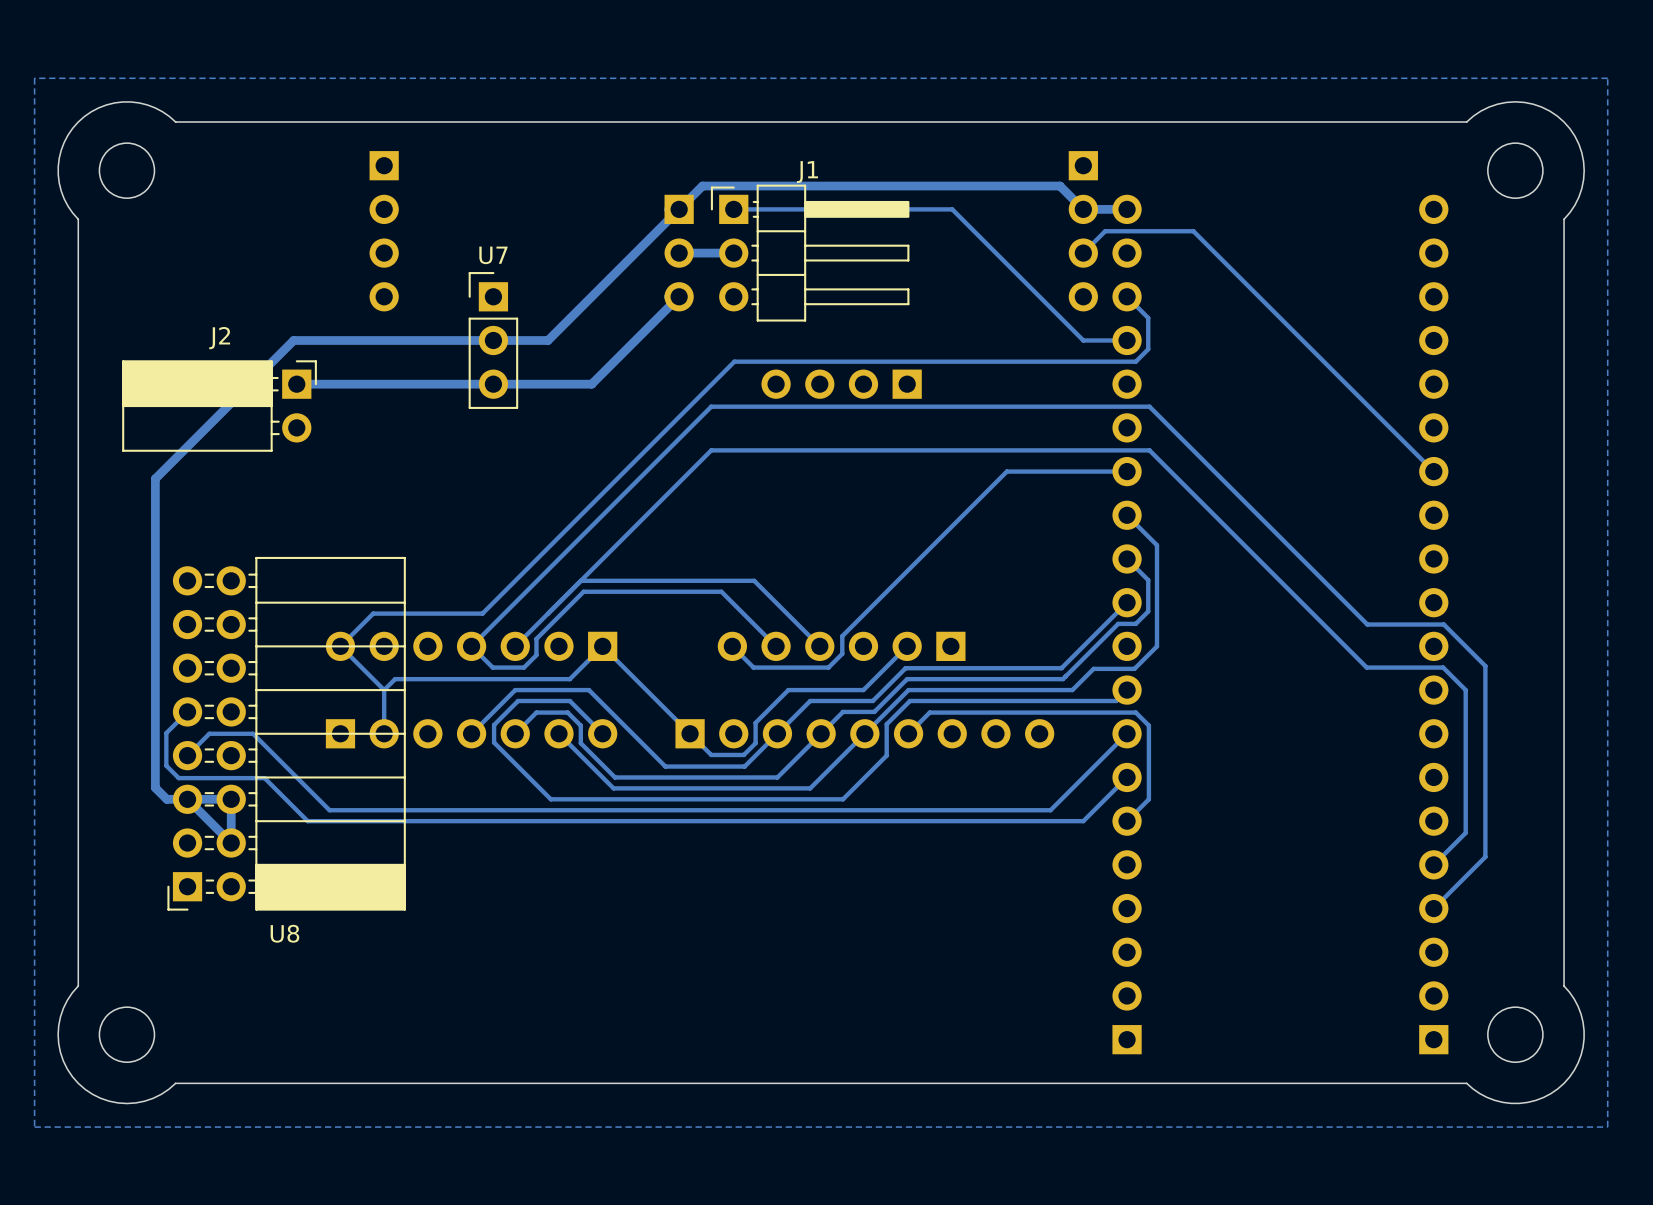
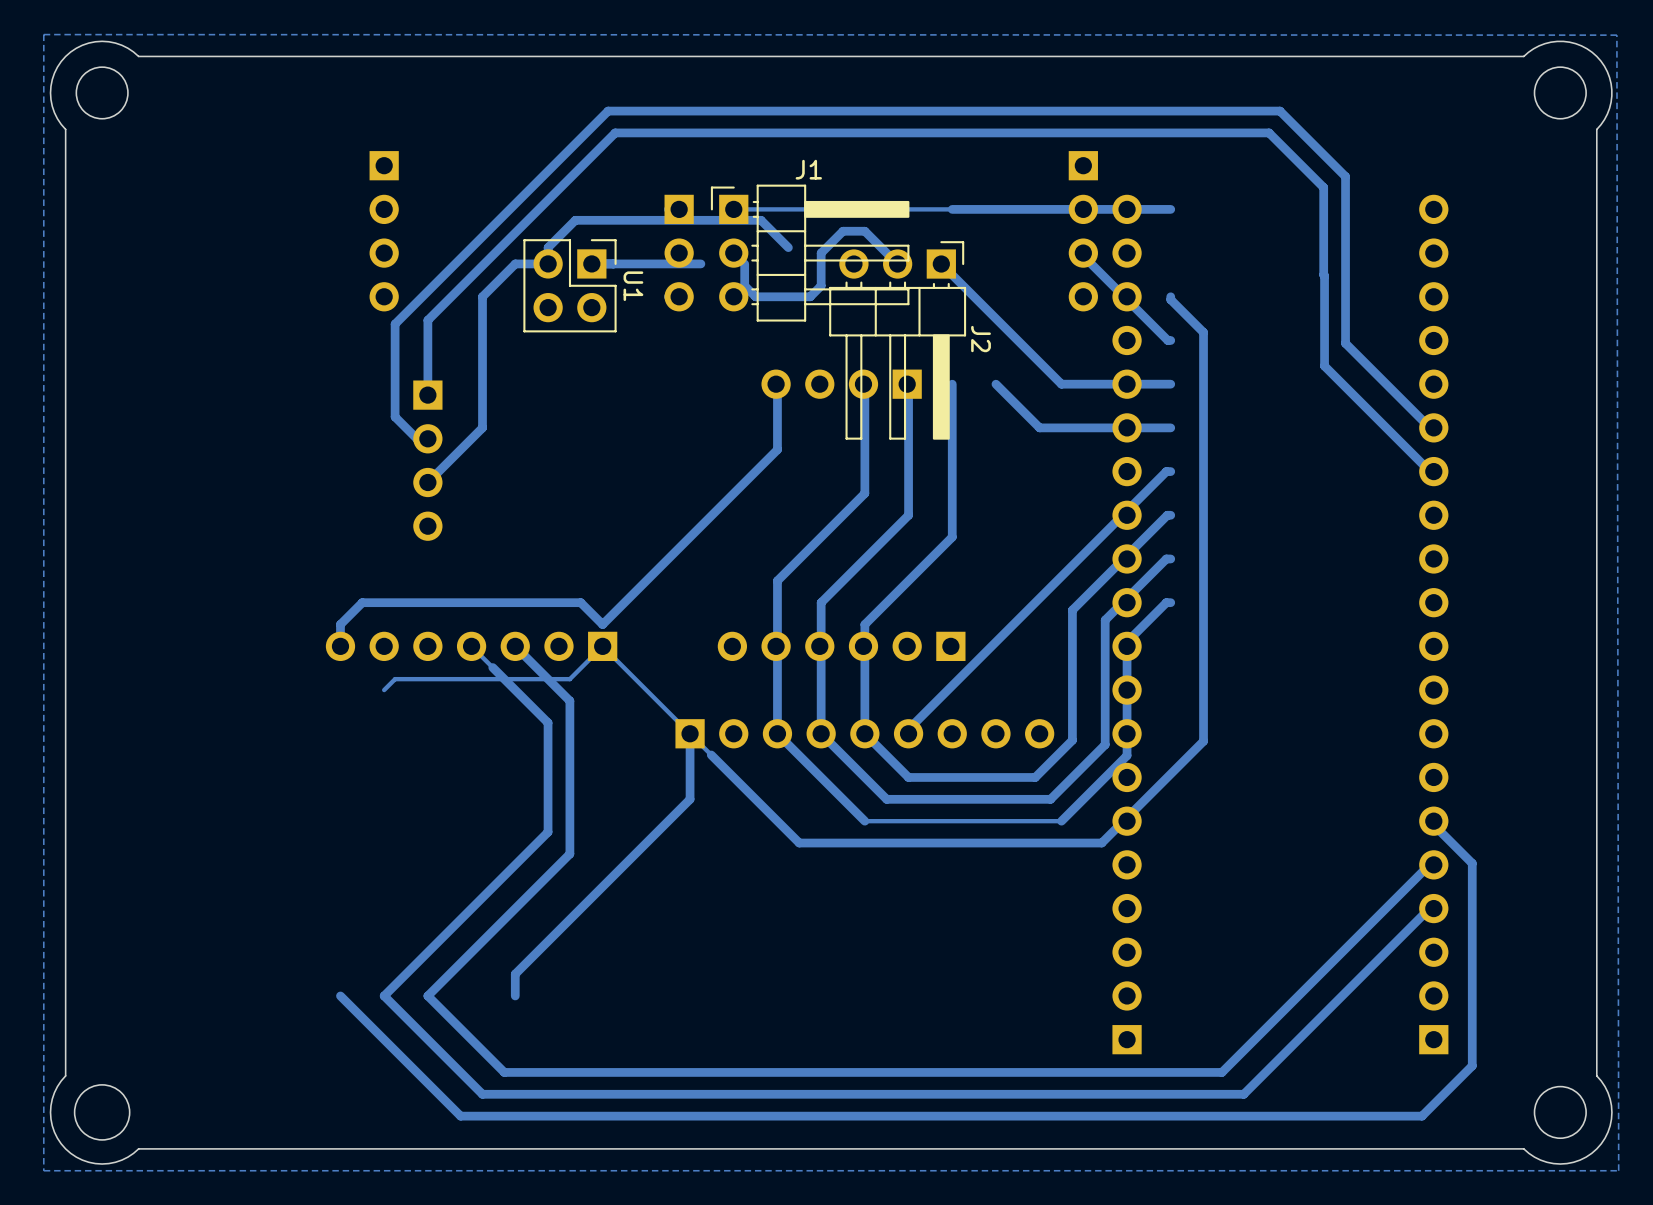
round board edge: none -> [75, 66, 129, 120]
round board edge: none -> [1534, 66, 1587, 120]
bottom zone outline: (1607, 78) (1607, 1127) (34, 1127) (34, 78) (1607, 78) -> (43, 34) (1616, 35) (1618, 1170) (43, 1170) (43, 34)
board edge: (1466, 121) (175, 121) (155, 107) (131, 101) (114, 102) (91, 111) (78, 121) (68, 135) (61, 150) (58, 166) (59, 183) (64, 198) (78, 219) (78, 986) (63, 1008) (58, 1034) (60, 1052) (72, 1076) (85, 1089) (100, 1098) (126, 1103) (153, 1098) (175, 1083) (1466, 1083) (1487, 1097) (1511, 1103) (1535, 1100) (1550, 1093) (1564, 1083) (1574, 1070) (1581, 1055) (1584, 1038) (1583, 1022) (1578, 1006) (1564, 986) (1564, 219) (1574, 205) (1581, 188) (1583, 161) (1578, 144) (1569, 128) (1557, 116) (1533, 104) (1515, 101) (1497, 104) (1480, 111) (1466, 121) -> (1523, 56) (1544, 43) (1563, 41) (1575, 43) (1592, 52) (1600, 61) (1609, 77) (1611, 89) (1609, 108) (1596, 129) (1596, 1075) (1608, 1092) (1611, 1112) (1610, 1125) (1605, 1138) (1591, 1153) (1573, 1162) (1560, 1164) (1540, 1160) (1523, 1148) (138, 1148) (121, 1160) (102, 1164) (82, 1160) (70, 1153) (61, 1143) (52, 1125) (50, 1112) (54, 1092) (65, 1075) (65, 129) (54, 112) (50, 92) (54, 73) (61, 61) (70, 52) (82, 45) (102, 41) (121, 45) (138, 56) (1523, 56)
round board edge: [98, 142, 155, 199] -> none
round board edge: [1487, 142, 1544, 199] -> none
bottom track: (952, 209) (1083, 340) (1127, 340) -> (952, 209) (1083, 209)
bottom track: (1083, 209) (1059, 186) (702, 186) (548, 340) (293, 340) (155, 478) (155, 787) (166, 799) (231, 799) (231, 843) (187, 799) -> none
bottom track: none -> (1170, 209) (1127, 209)
bottom track: none -> (788, 247) (761, 220) (575, 220) (548, 247) (548, 263) (515, 263) (482, 296) (482, 427) (427, 482)
bottom track: (733, 253) (678, 253) -> none
bottom track: (1083, 253) (1105, 231) (1193, 231) (1433, 471) -> (1083, 253) (1083, 255) (1167, 340) (1170, 340)
bottom track: none -> (700, 263) (591, 263)
bottom track: none -> (897, 264) (864, 231) (843, 231) (821, 253) (821, 285) (810, 296) (755, 296) (744, 285) (744, 264)
bottom track: none -> (941, 264) (1061, 384) (1170, 384)
U1: none -> (569, 285)
bottom track: (679, 296) (591, 384) (296, 384) -> none
bottom track: (1127, 296) (1148, 317) (1148, 349) (1135, 361) (734, 361) (482, 613) (373, 613) (340, 646) (384, 690) (384, 733) -> none
J2 name position: J2 (219, 338) -> J2 (981, 339)
U7: (493, 340) -> none
J2 footprint: [122, 360, 317, 452] -> [829, 241, 967, 440]
bottom track: none -> (777, 384) (777, 449) (602, 624) (580, 602) (362, 602) (340, 624) (340, 646)
bottom track: none -> (908, 384) (908, 515) (821, 602) (821, 733) (886, 799) (1050, 799) (1105, 744) (1105, 620) (1166, 558) (1170, 558)
bottom track: none -> (952, 384) (952, 537) (864, 624) (864, 733) (908, 777) (1035, 777) (1072, 740) (1072, 610) (1167, 515) (1170, 515)
bottom track: none -> (995, 384) (1039, 427) (1170, 427)
bottom track: none -> (427, 395) (427, 320) (615, 132) (1269, 132) (1323, 187) (1324, 366) (1430, 471)
bottom track: none -> (1430, 427) (1345, 343) (1345, 176) (1279, 111) (608, 111) (395, 324) (395, 416) (416, 438) (427, 438)
part: none -> (427, 460)
bottom track: (1127, 471) (1006, 471) (842, 636) (842, 653) (828, 667) (753, 667) (732, 646) -> none
bottom track: (1127, 515) (1157, 545) (1157, 646) (1134, 668) (1093, 668) (1072, 690) (908, 690) (810, 788) (613, 788) (558, 733) -> none
bottom track: (1127, 558) (1148, 580) (1148, 611) (1135, 623) (1118, 623) (1062, 679) (907, 679) (874, 711) (843, 711) (777, 777) (615, 777) (580, 743) (580, 725) (567, 712) (536, 712) (515, 733) -> none
bottom track: (580, 580) (754, 580) (819, 646) -> none
bottom track: (1127, 602) (1062, 667) -> none
bottom track: (471, 646) (711, 406) (1149, 406) (1367, 624) (1443, 624) (1485, 666) (1485, 856) (1433, 908) -> none
bottom track: (515, 646) (711, 450) (1149, 450) (1366, 667) (1443, 667) (1465, 690) (1465, 832) (1433, 864) -> (515, 646) (569, 701) (569, 853) (427, 995) (504, 1072) (1221, 1072) (1429, 864)
bottom track: (776, 646) (721, 591) (583, 591) (536, 638) (536, 655) (524, 667) (492, 667) -> (1429, 908) (1243, 1094) (482, 1094) (384, 995) (548, 832) (548, 722) (492, 667)
bottom track: (907, 646) (863, 690) (788, 690) (755, 722) (755, 743) (743, 754) (711, 754) -> (1170, 296) (1170, 299) (1203, 332) (1203, 741) (1101, 843) (799, 843) (711, 754)
bottom track: (1062, 667) (905, 668) (872, 701) (810, 701) (744, 766) (665, 766) (588, 690) (515, 690) (471, 733) -> none
bottom track: (1127, 690) (1116, 701) (910, 701) (886, 724) (886, 755) (843, 799) (550, 799) (494, 742) (494, 724) (518, 701) (569, 701) (602, 733) -> none
bottom track: (187, 711) (166, 733) (166, 765) (178, 778) (264, 778) (307, 821) (864, 821) -> (864, 384) (864, 493) (777, 580) (777, 733) (864, 821)
U8: (286, 733) -> none
part: (471, 733) -> none
bottom track: none -> (690, 733) (690, 799) (515, 974) (515, 995)
bottom track: (908, 733) (929, 712) (1135, 712) (1148, 725) (1148, 799) (1127, 821) -> (908, 733) (908, 729) (1166, 471) (1170, 471)
bottom track: (1127, 733) (1050, 810) (329, 810) (253, 733) (209, 733) (187, 755) -> none
bottom track: (1127, 777) (1083, 821) (1061, 821) -> (1170, 602) (1166, 602) (1127, 642) (1127, 755) (1061, 821)
bottom track: none -> (1429, 820) (1472, 863) (1472, 1065) (1422, 1116) (460, 1116) (340, 995)
round board edge: [1487, 1006, 1544, 1063] -> none
round board edge position: (126, 1034) -> (102, 1112)
round board edge: none -> [1534, 1086, 1587, 1139]

